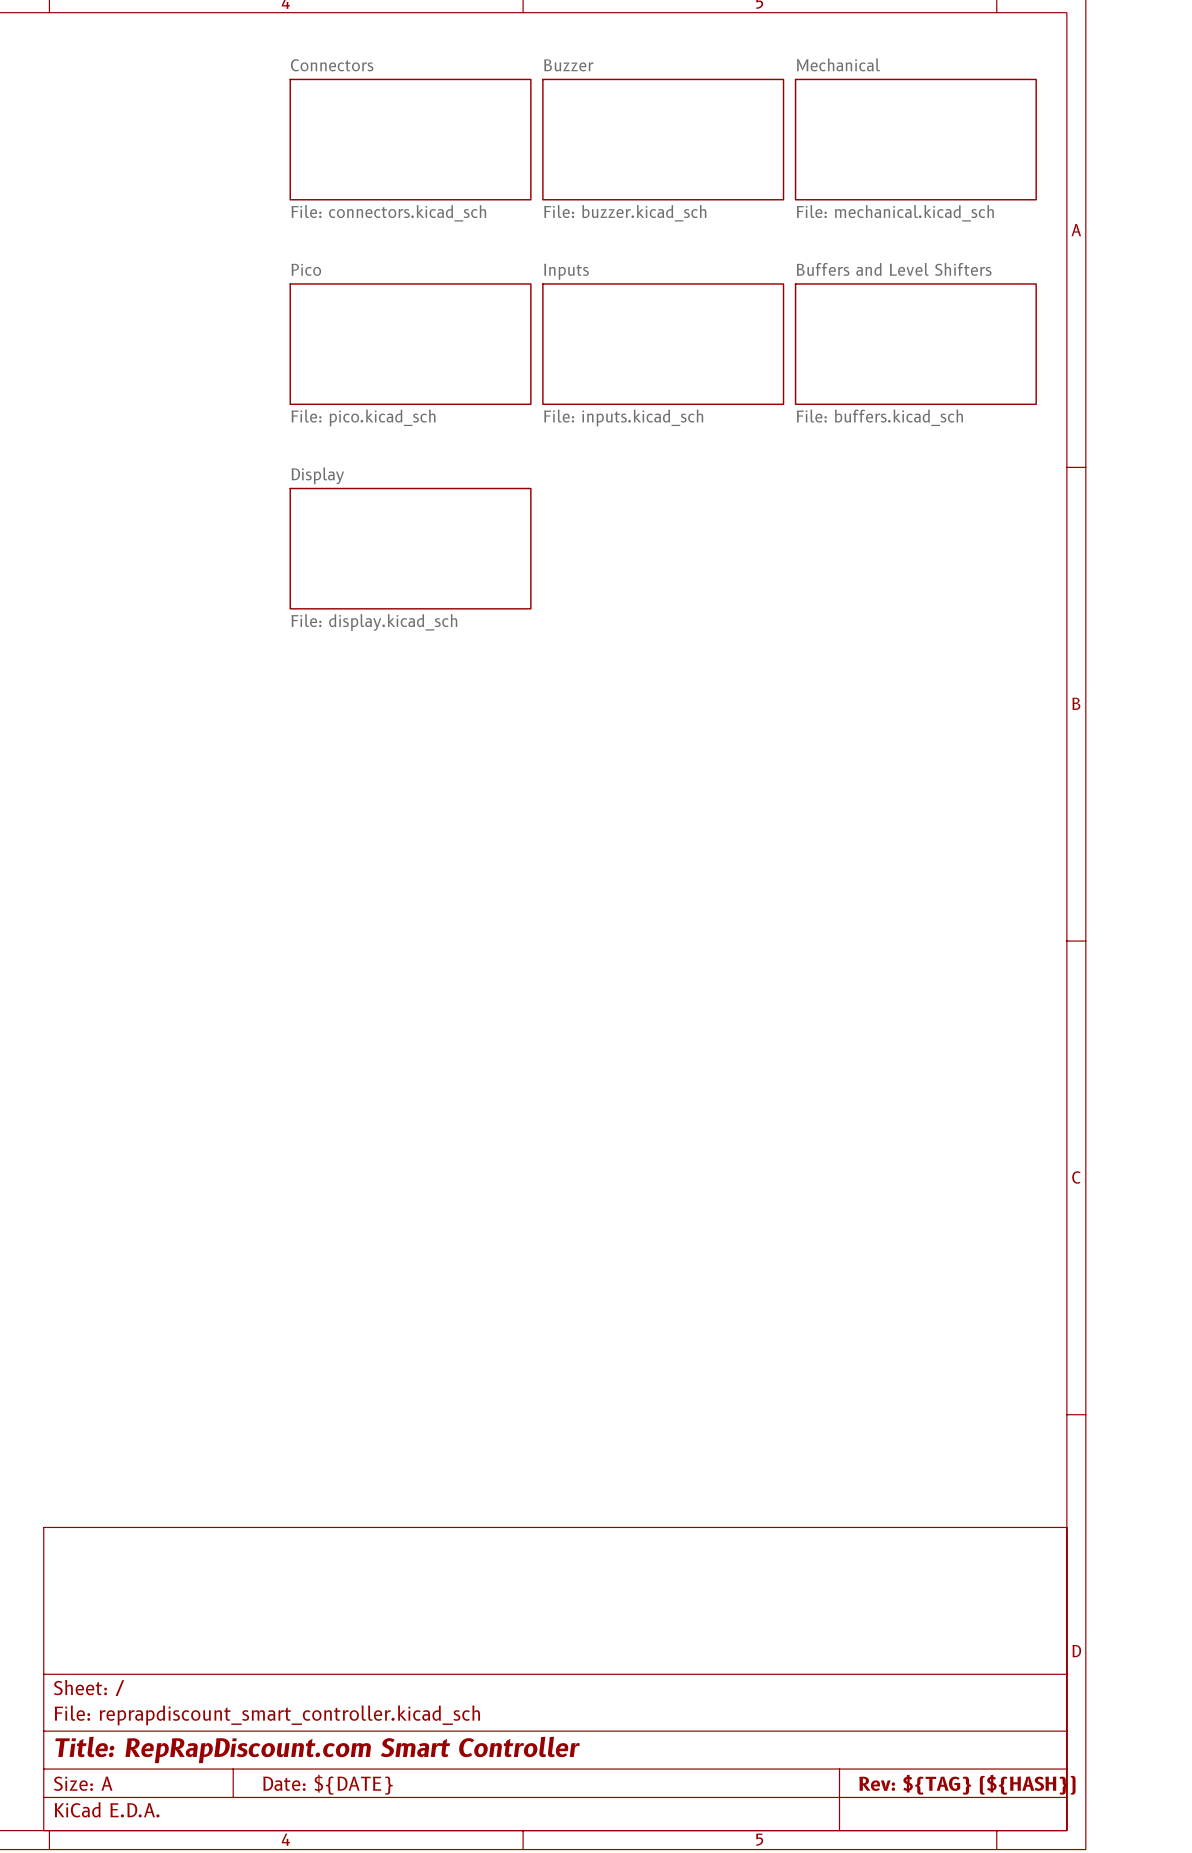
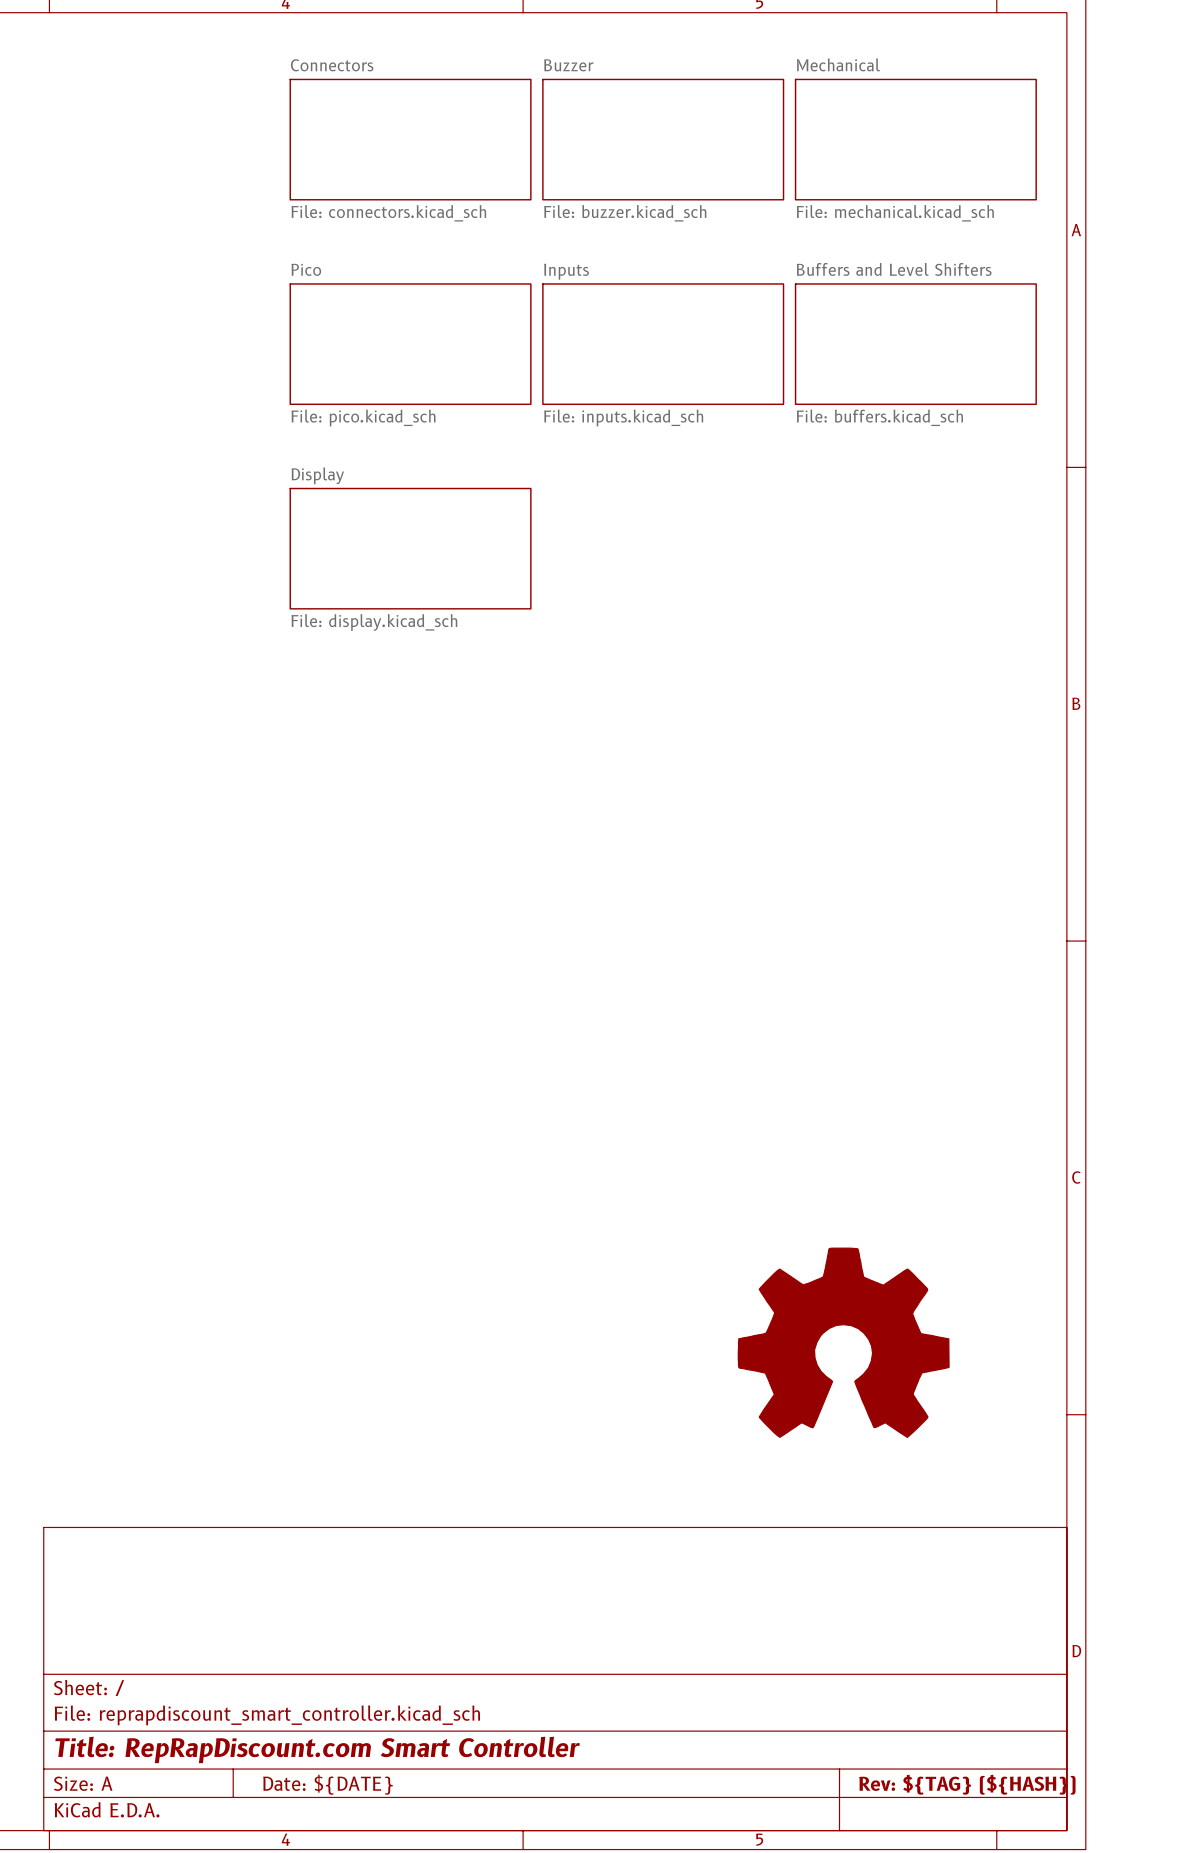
part: none -> (843, 1342)

